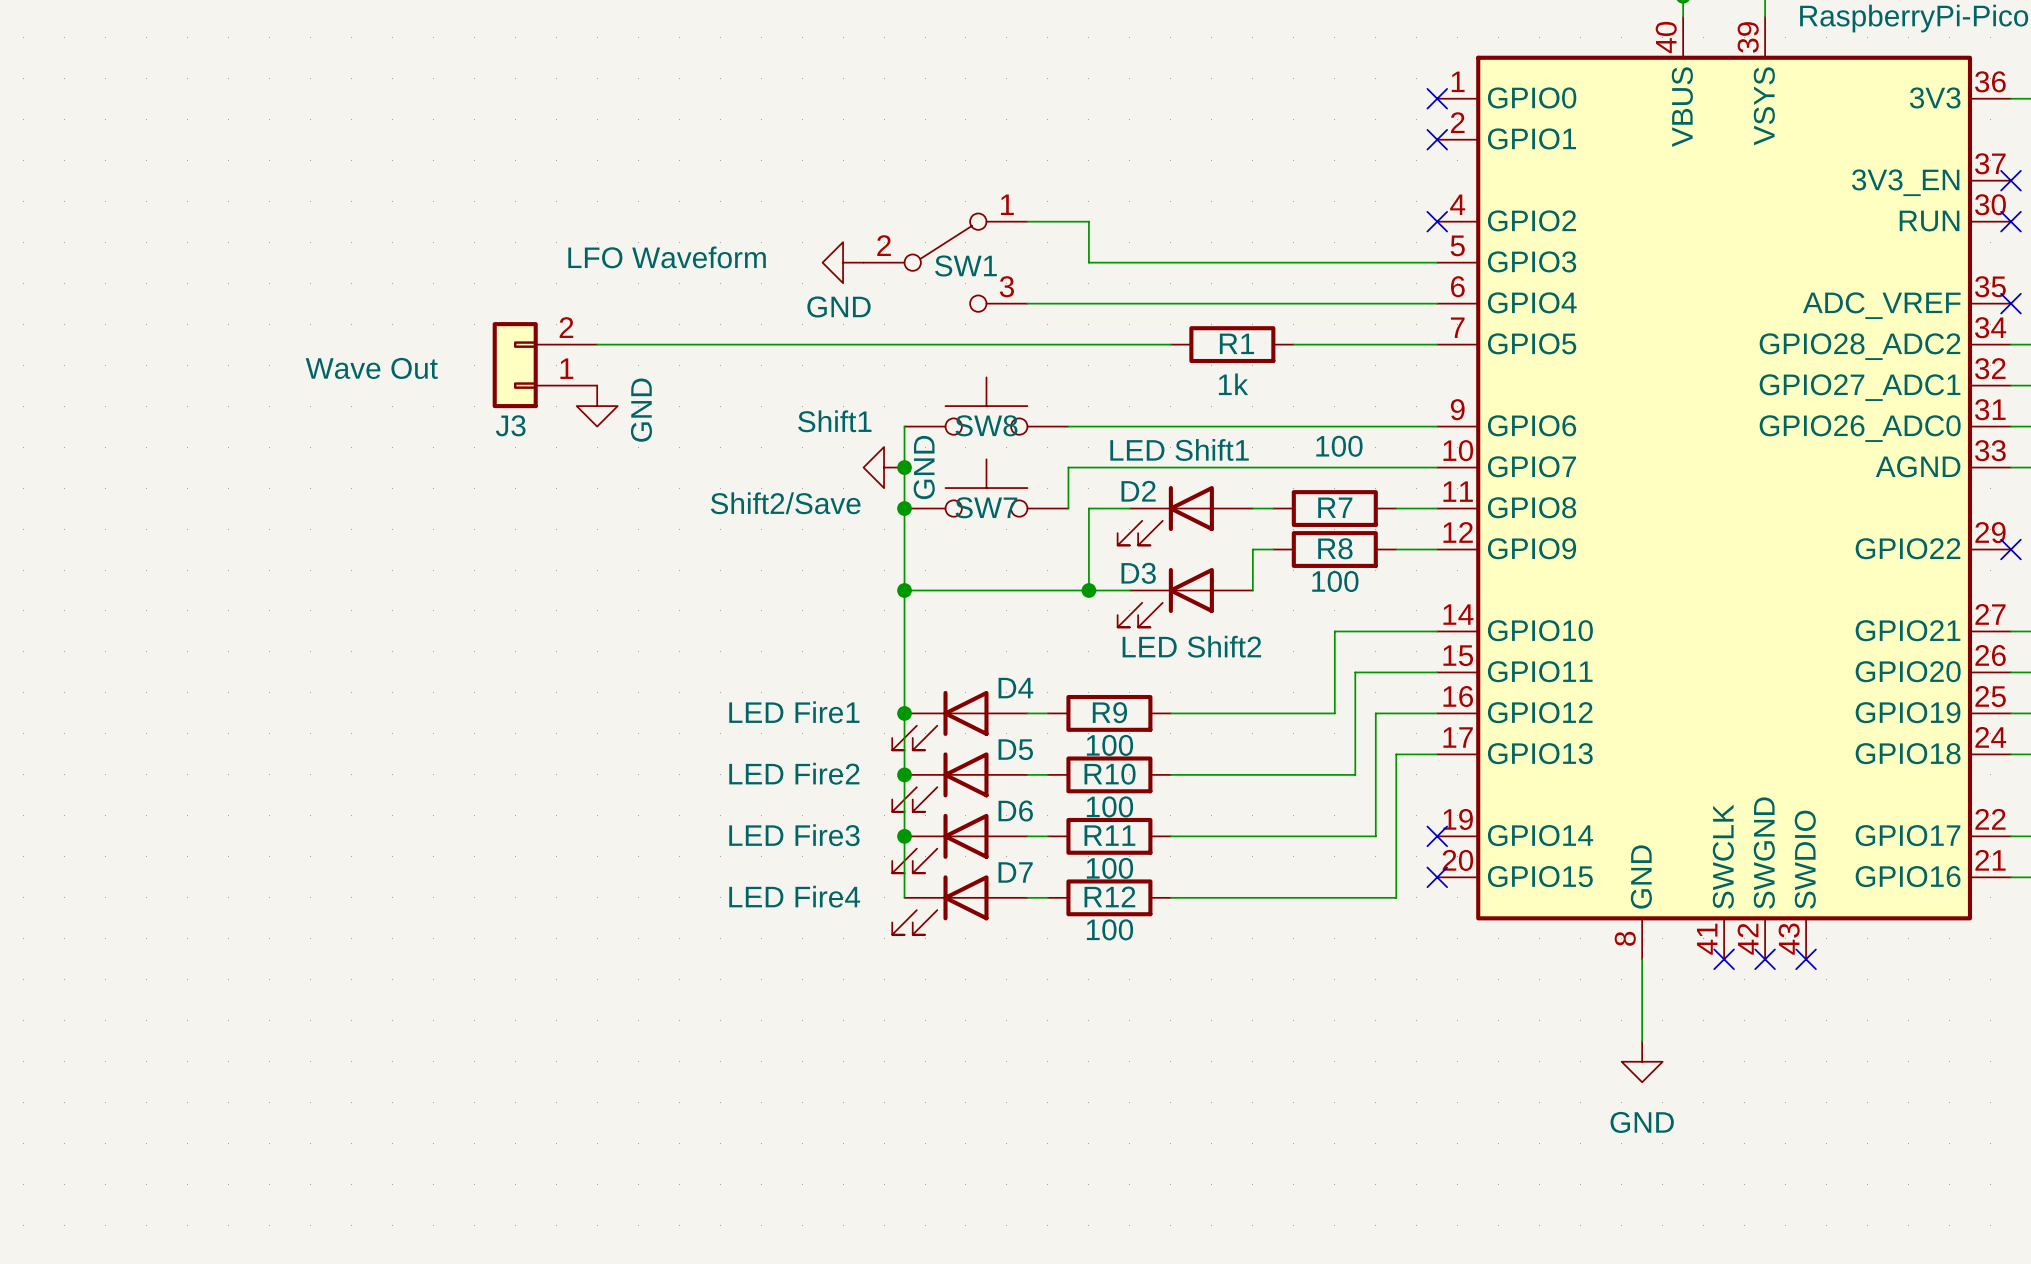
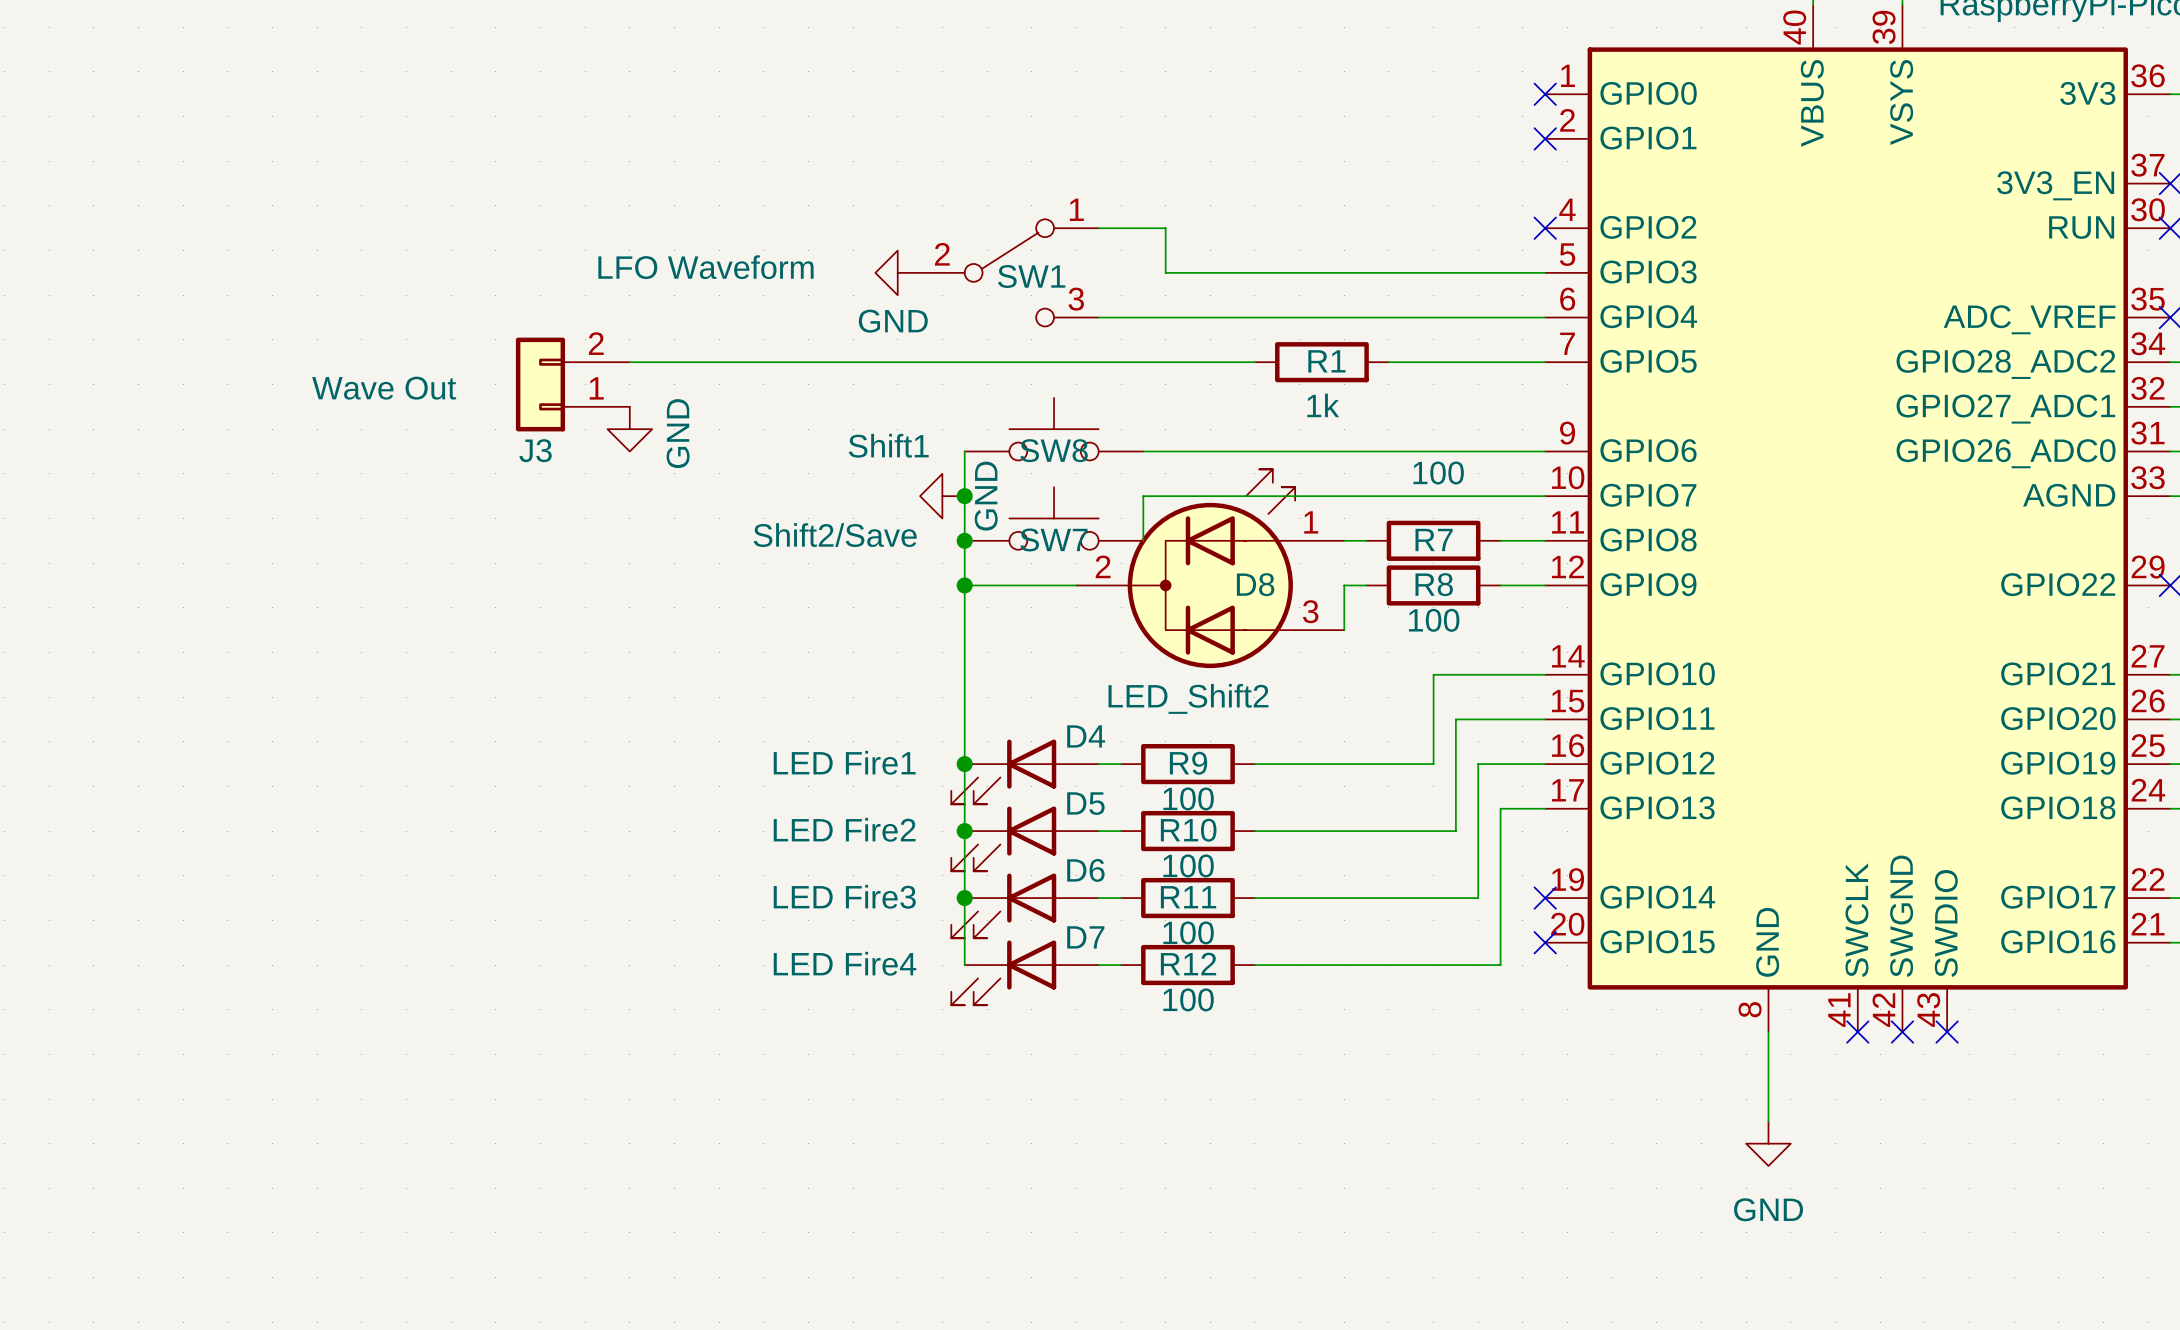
D2: LED Shift1 (1185, 515) -> none
D8: none -> LED_Shift2 (1210, 568)
wire: none -> (964, 585) (1076, 585)
wire: (904, 590) (1129, 590) -> none
junction position: (904, 590) -> (964, 585)
junction: (1088, 590) -> none
D3: LED Shift2 (1185, 597) -> none

